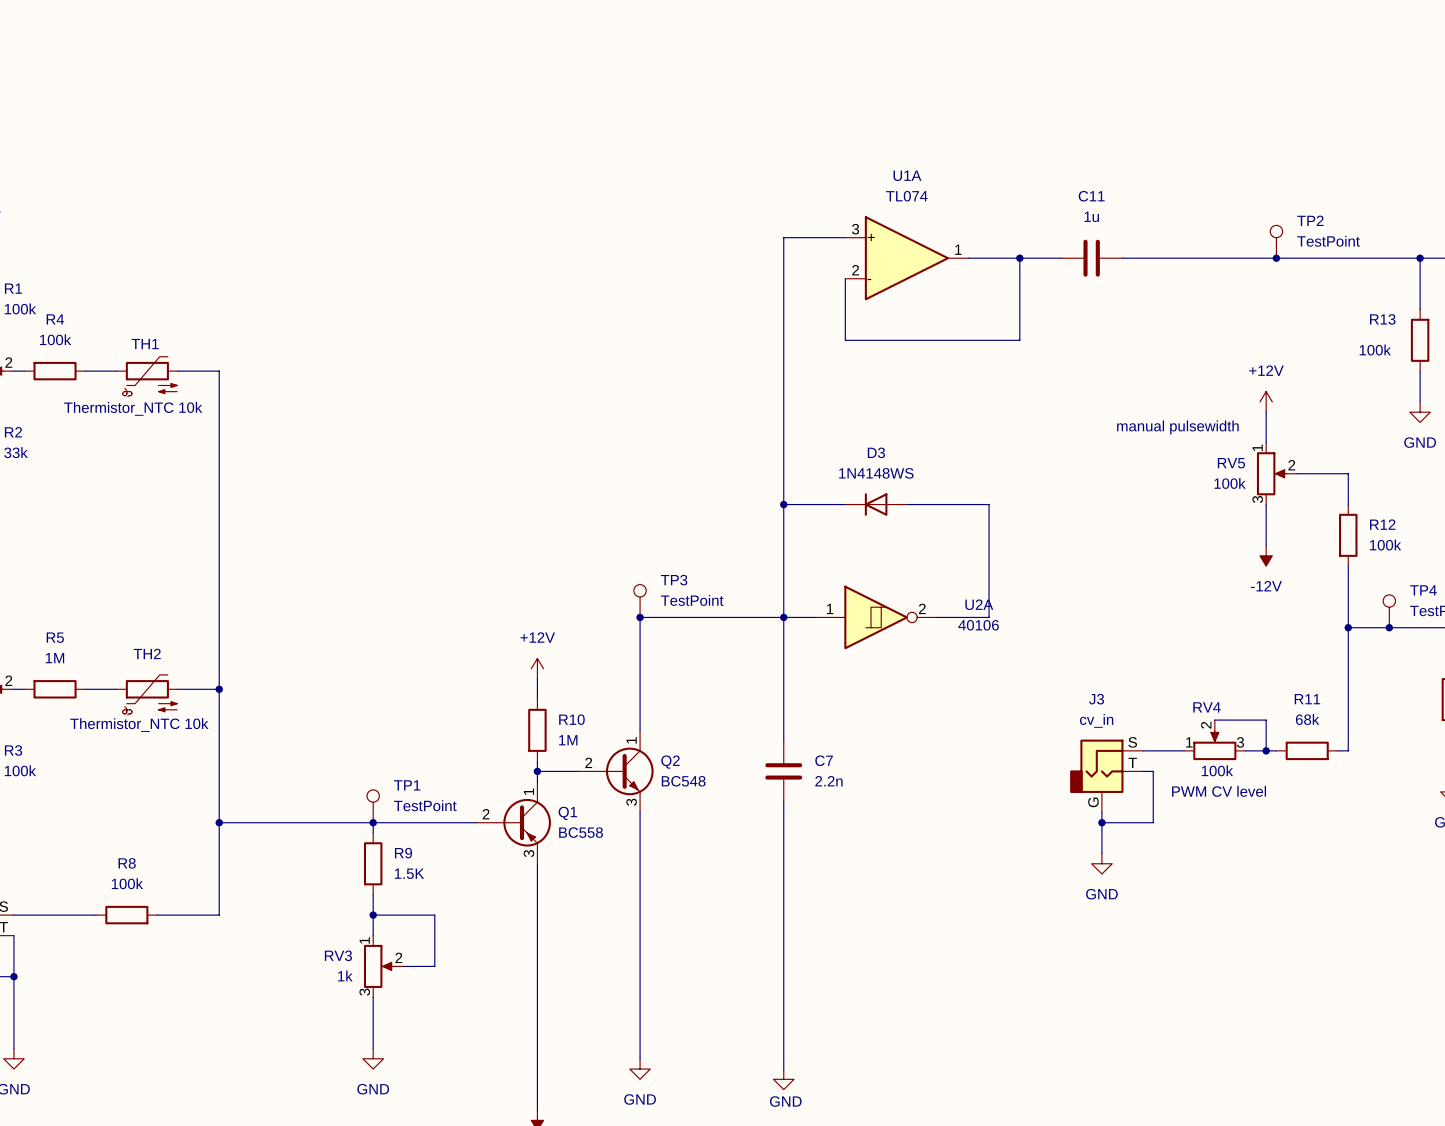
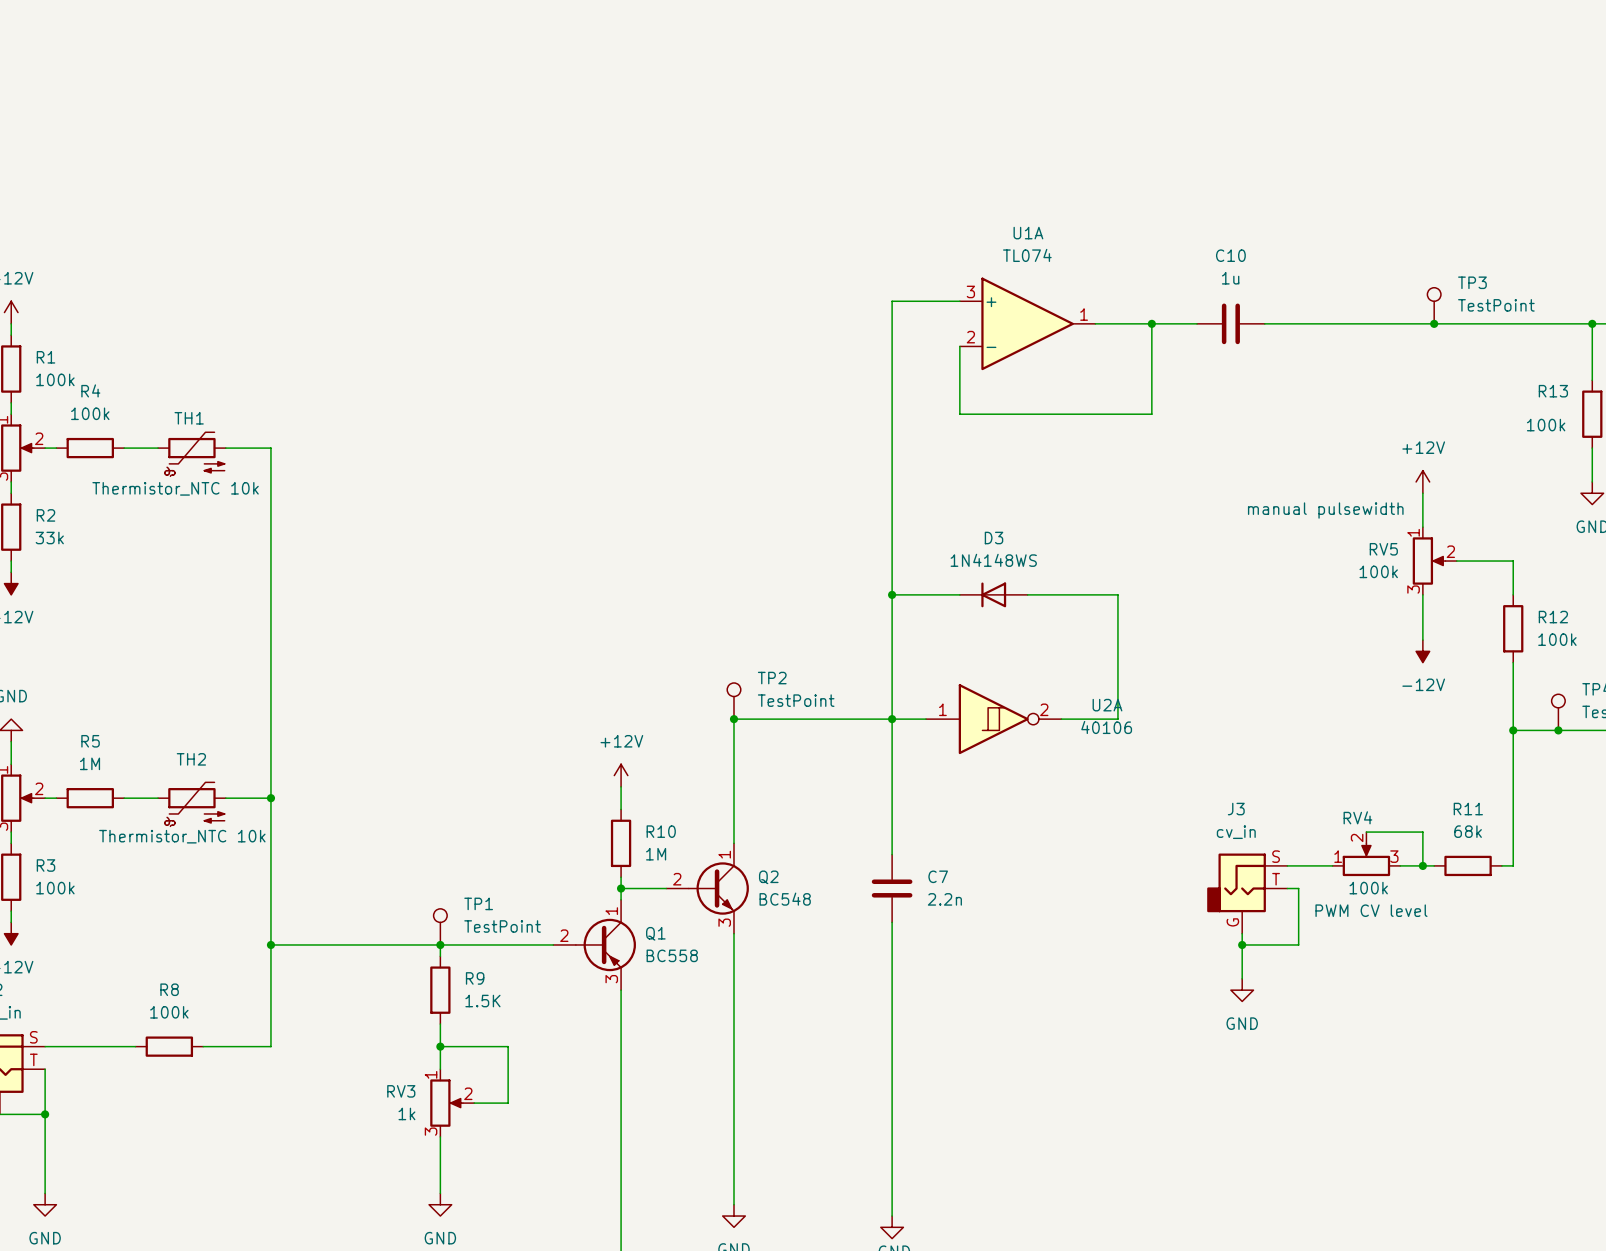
C11 name: C11 (1091, 196) -> C10 (1230, 255)
TP2 name: TP2 (1310, 220) -> TP3 (1472, 282)
TP3 name: TP3 (674, 580) -> TP2 (772, 678)

